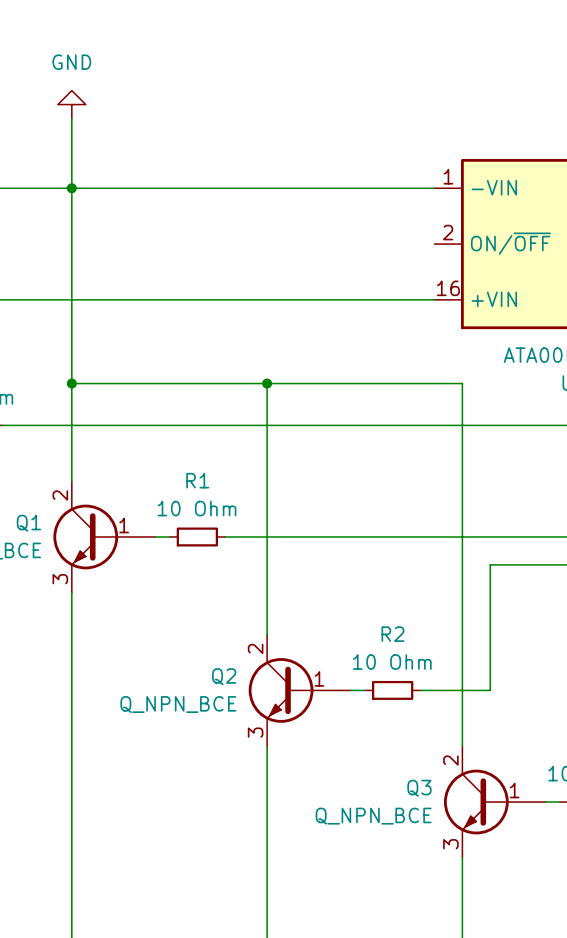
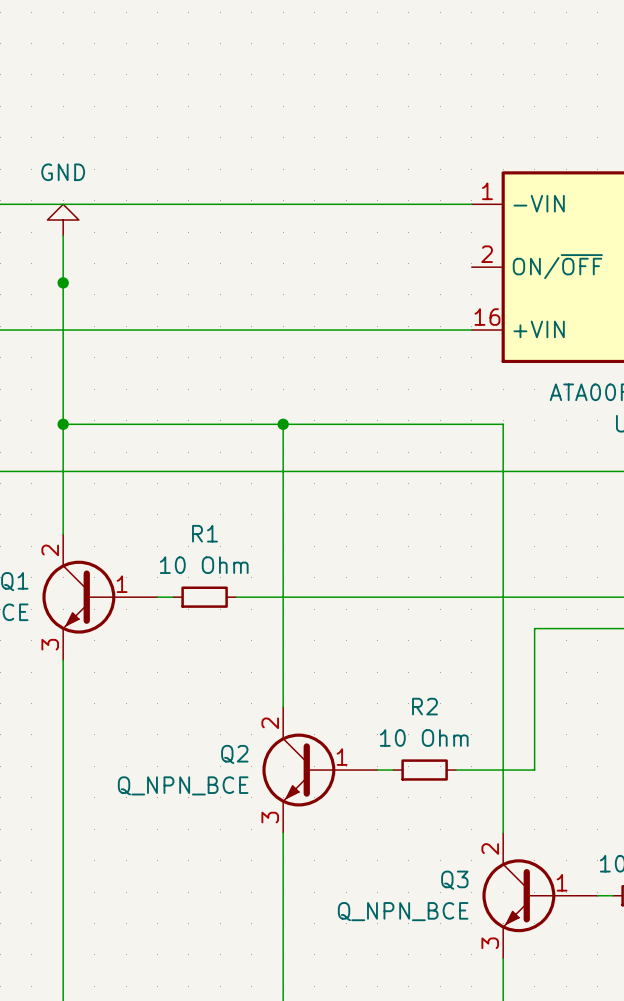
power symbol position: GND (71, 104) -> GND (63, 220)
wire: (71, 118) (71, 216) -> none
junction: (71, 188) -> none
junction: none -> (63, 282)

